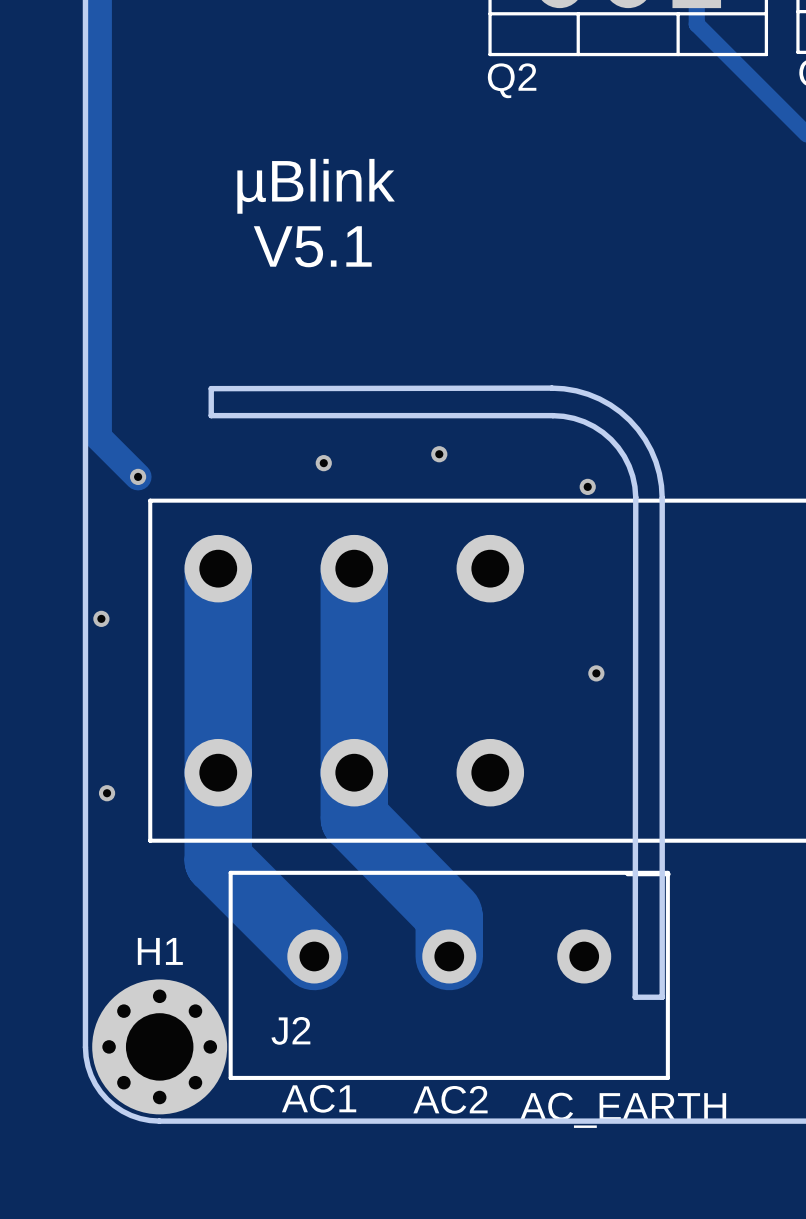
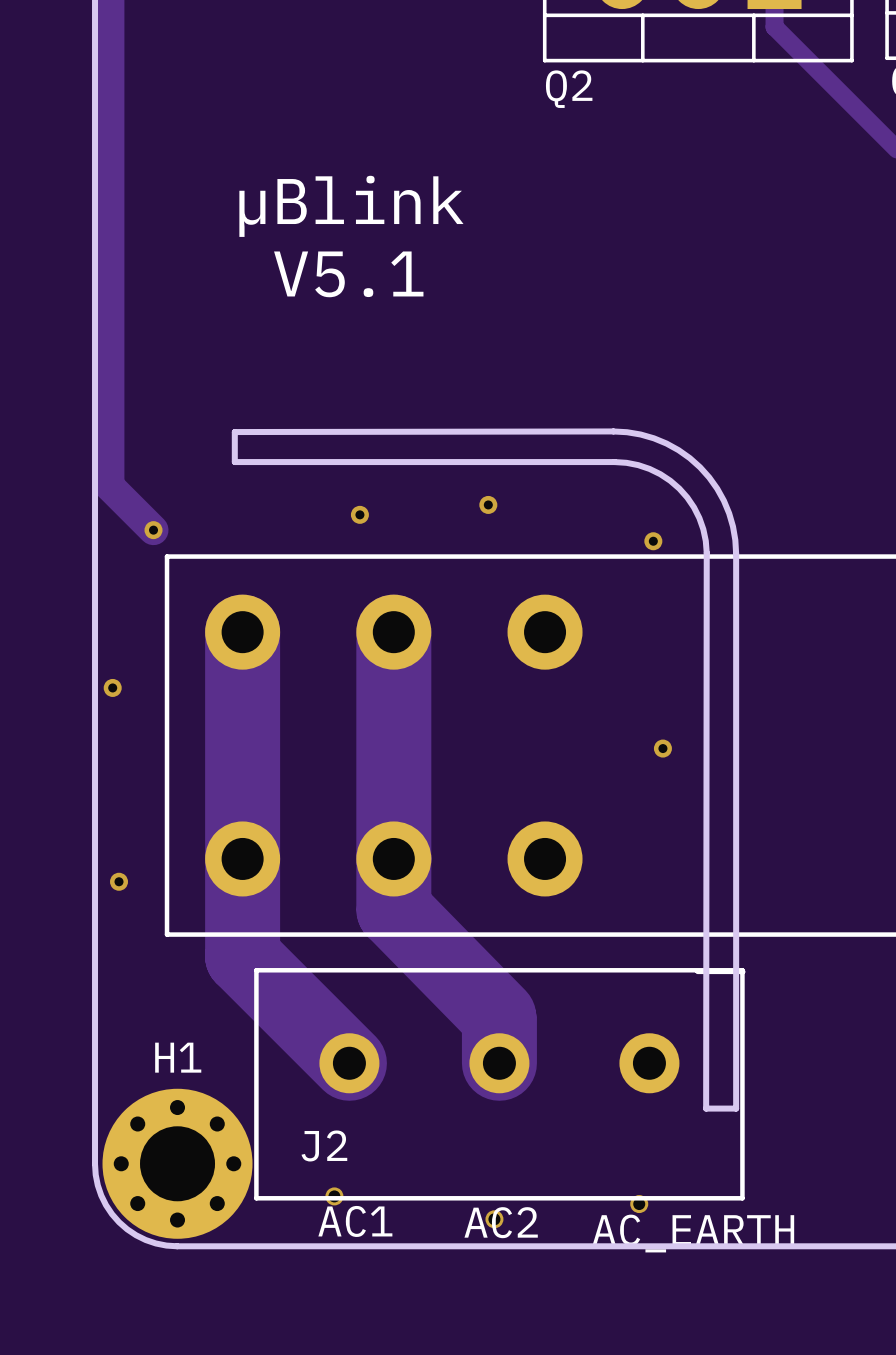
via: none -> (334, 1196)
via: none -> (639, 1204)
via: none -> (494, 1219)

